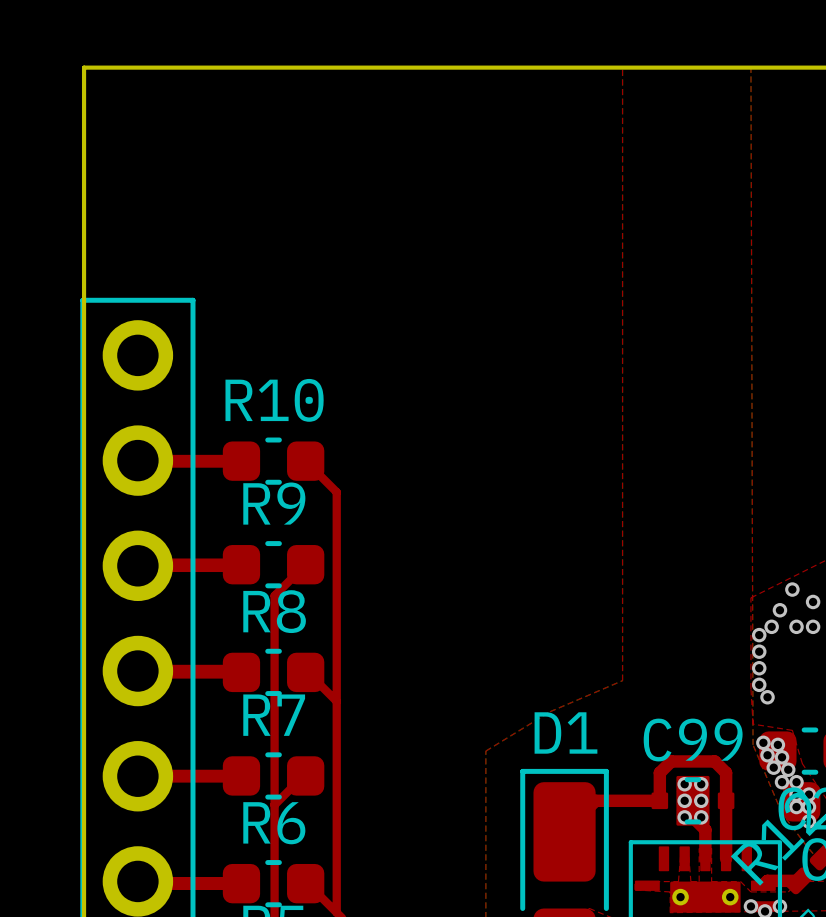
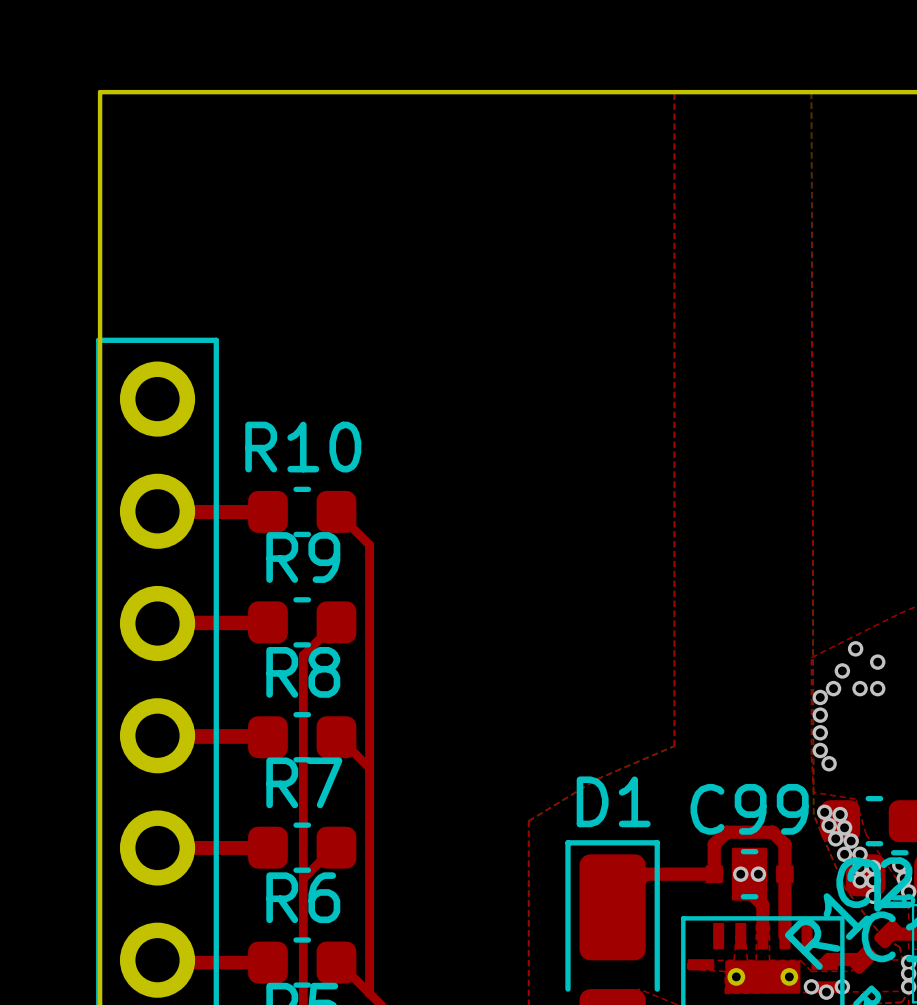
via: (684, 784) -> none
via: (701, 784) -> none
via: (684, 817) -> none
via: (701, 817) -> none

